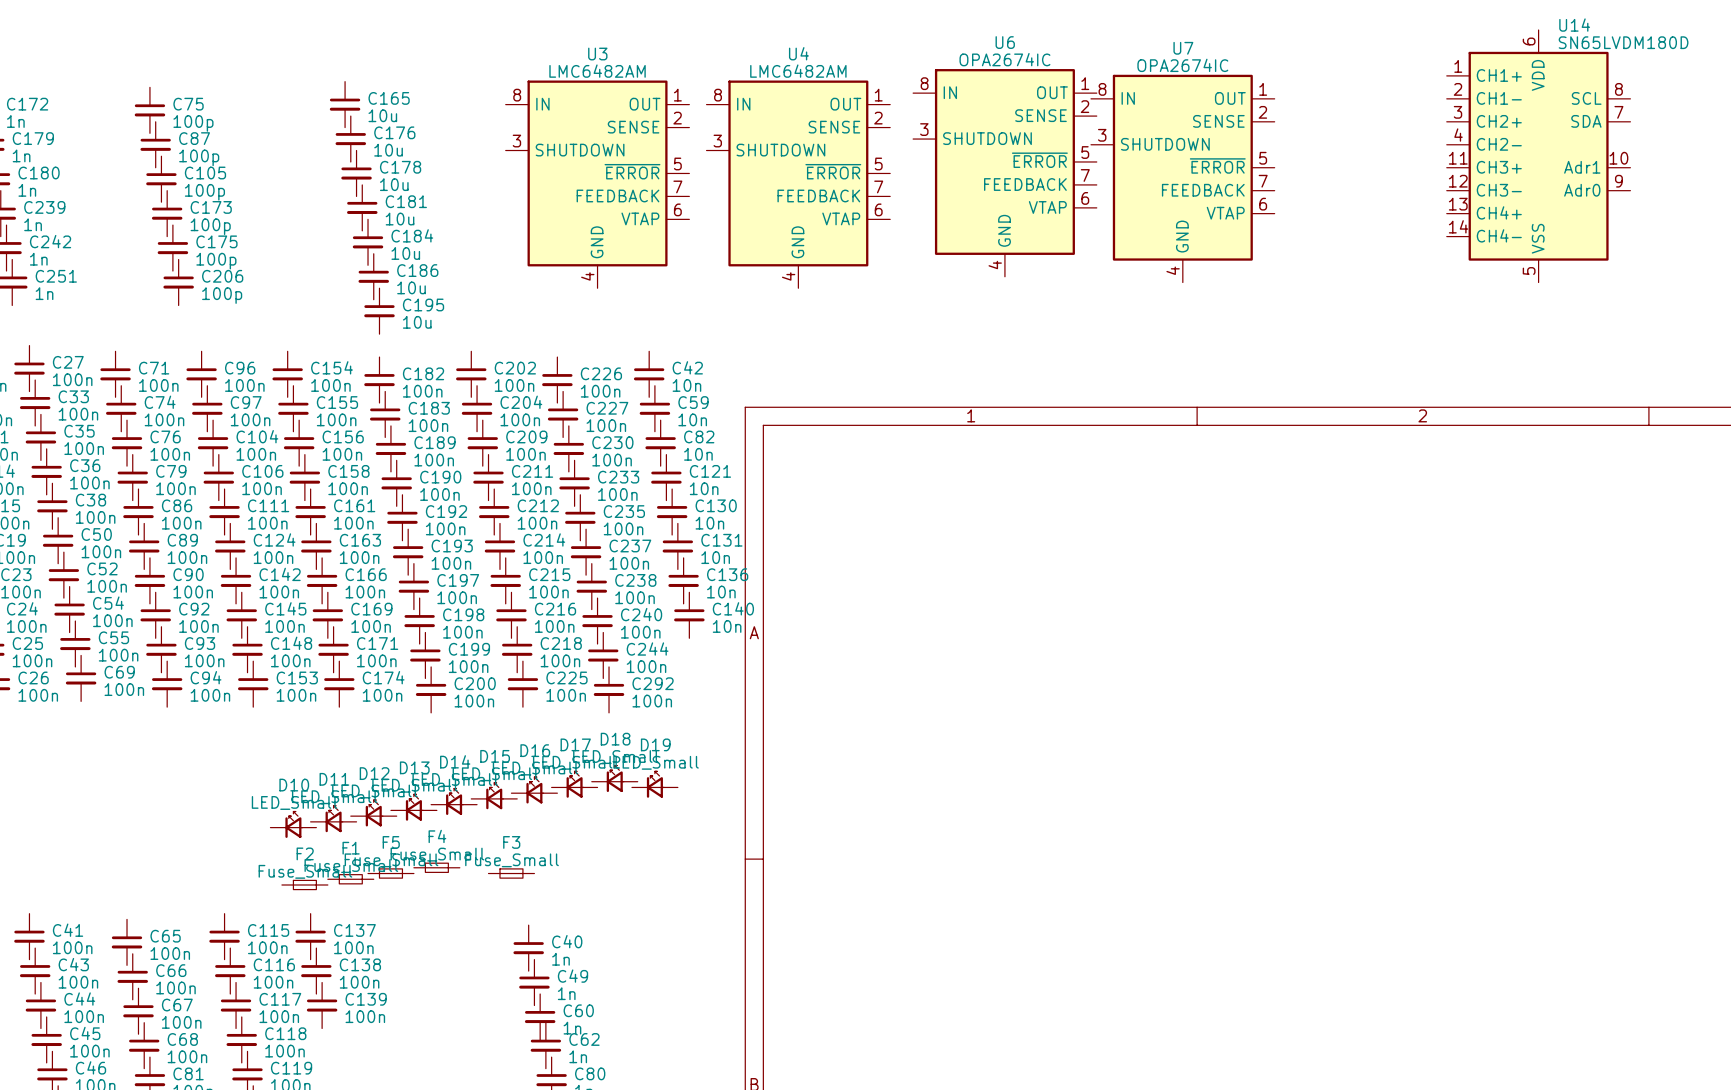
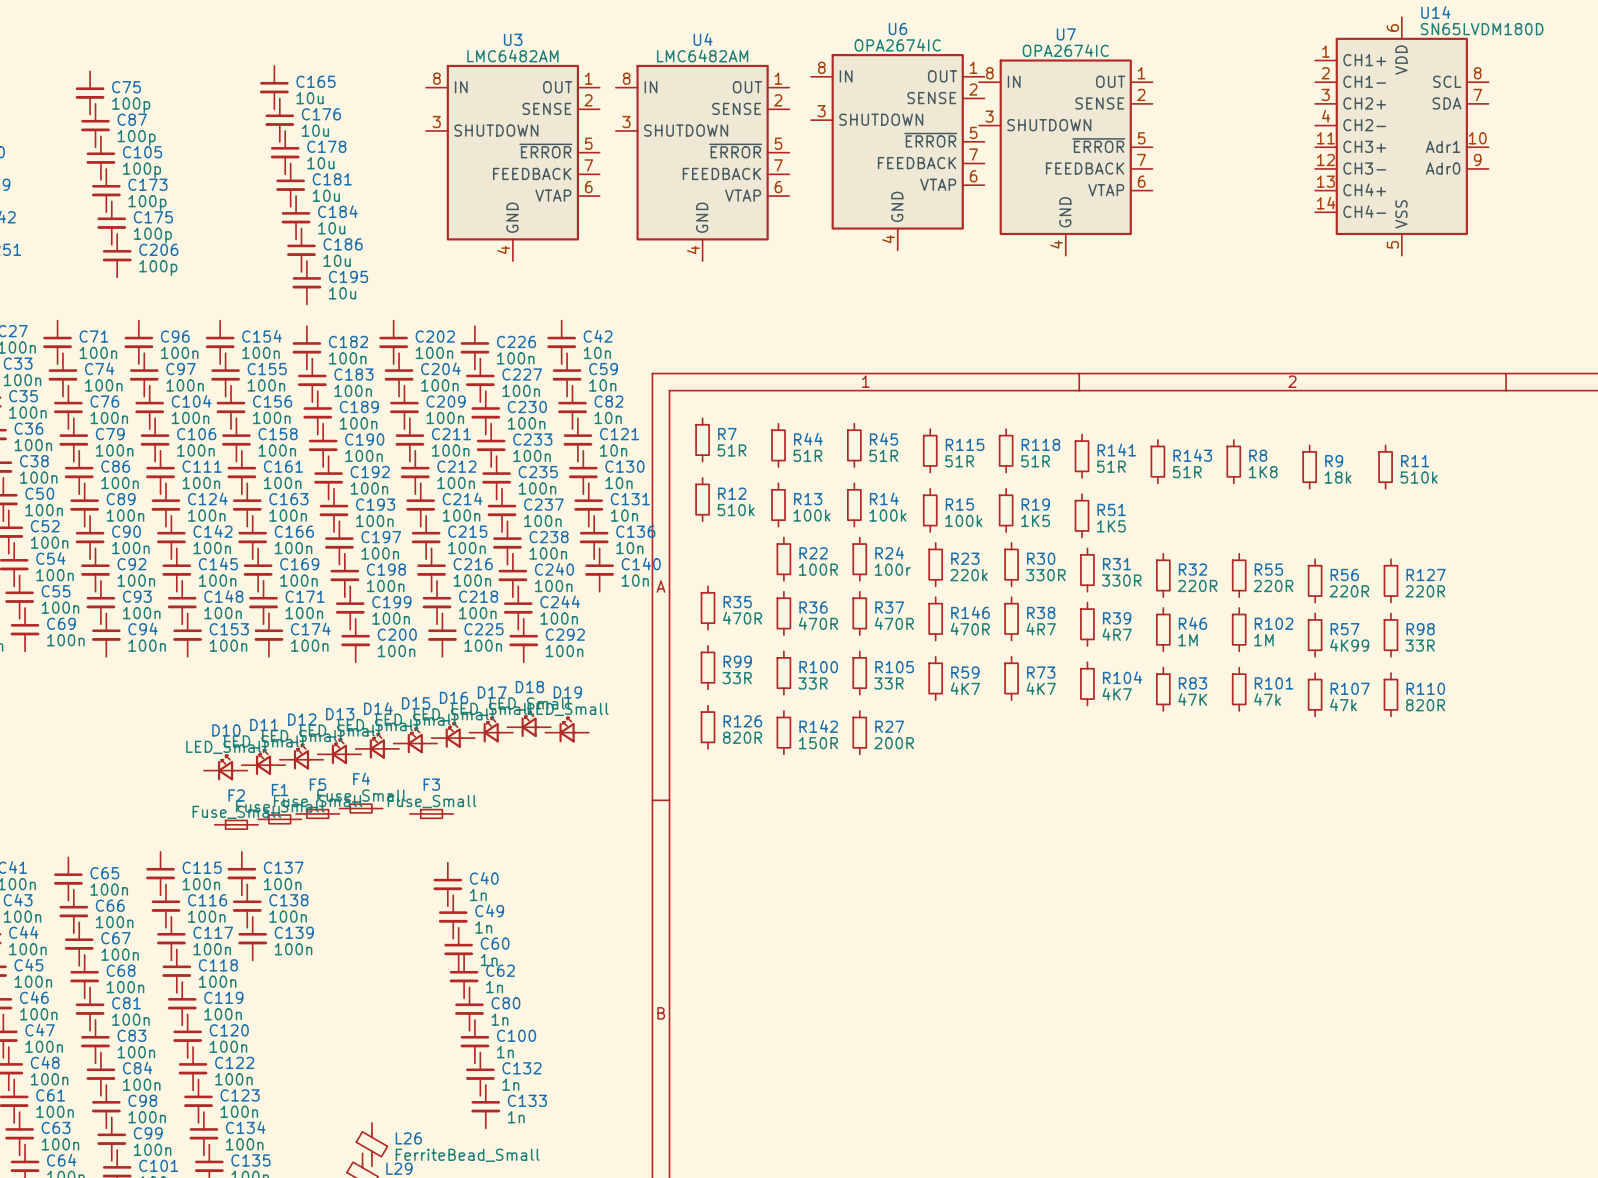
R7: none -> 51R (702, 439)
R44: none -> 51R (778, 445)
R45: none -> 51R (854, 445)
R115: none -> 51R (930, 450)
R118: none -> 51R (1006, 450)
R141: none -> 51R (1082, 456)
R143: none -> 51R (1157, 461)
R8: none -> 1K8 (1233, 461)
R9: none -> 18k (1309, 467)
R11: none -> 510k (1385, 467)
R12: none -> 510k (702, 499)
R13: none -> 100k (778, 505)
R14: none -> 100k (854, 505)
R15: none -> 100k (930, 510)
R19: none -> 1K5 (1006, 510)
R51: none -> 1K5 (1082, 515)
R22: none -> 100R (783, 559)
R24: none -> 100r (859, 559)
R23: none -> 220k (935, 564)
R30: none -> 330R (1011, 564)
R31: none -> 330R (1087, 570)
R32: none -> 220R (1163, 575)
R55: none -> 220R (1239, 575)
R56: none -> 220R (1315, 580)
R127: none -> 220R (1390, 580)
R35: none -> 470R (708, 607)
R36: none -> 470R (783, 613)
R37: none -> 470R (859, 613)
R146: none -> 470R (935, 618)
R38: none -> 4R7 (1011, 618)
R39: none -> 4R7 (1087, 624)
R46: none -> 1M (1163, 629)
R102: none -> 1M (1239, 629)
R57: none -> 4K99 (1315, 635)
R98: none -> 33R (1390, 635)
R99: none -> 33R (708, 667)
R100: none -> 33R (783, 673)
R105: none -> 33R (859, 673)
R59: none -> 4K7 (935, 678)
R73: none -> 4K7 (1011, 678)
R104: none -> 4K7 (1087, 683)
R83: none -> 47K (1163, 689)
R101: none -> 47k (1239, 689)
R107: none -> 47k (1315, 694)
R110: none -> 820R (1390, 694)
R126: none -> 820R (708, 727)
R142: none -> 150R (783, 732)
R27: none -> 200R (859, 732)

